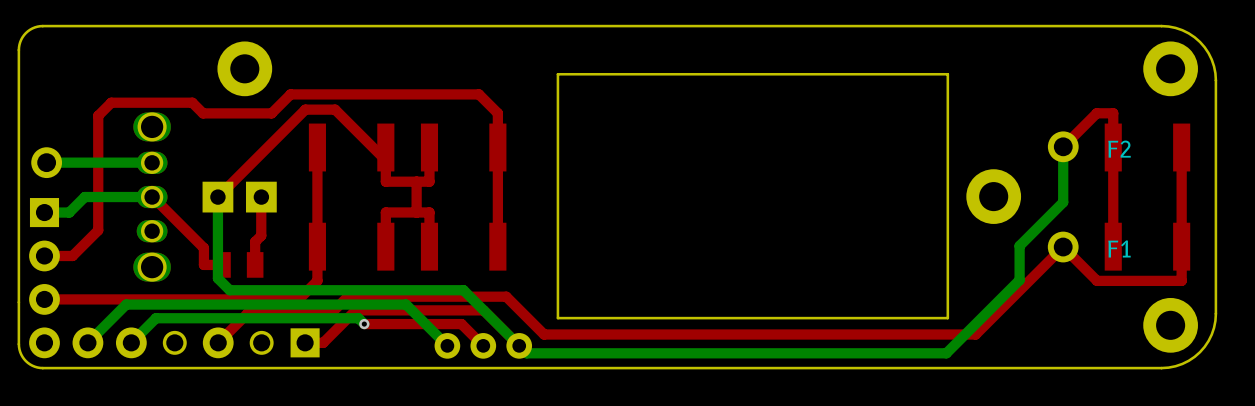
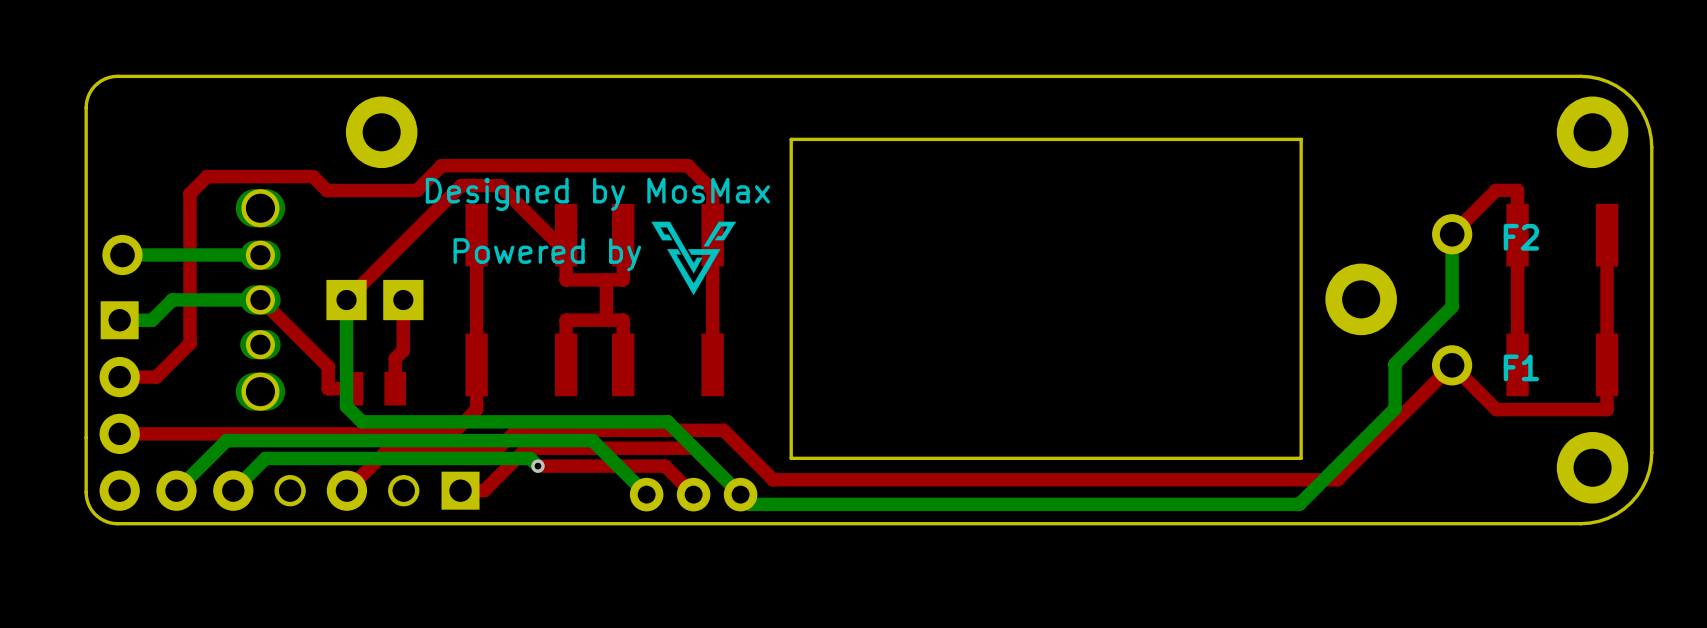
text: none -> Designed by MosMax (597, 194)
drawing: none -> [651, 221, 737, 296]
text: none -> Powered by (547, 254)

